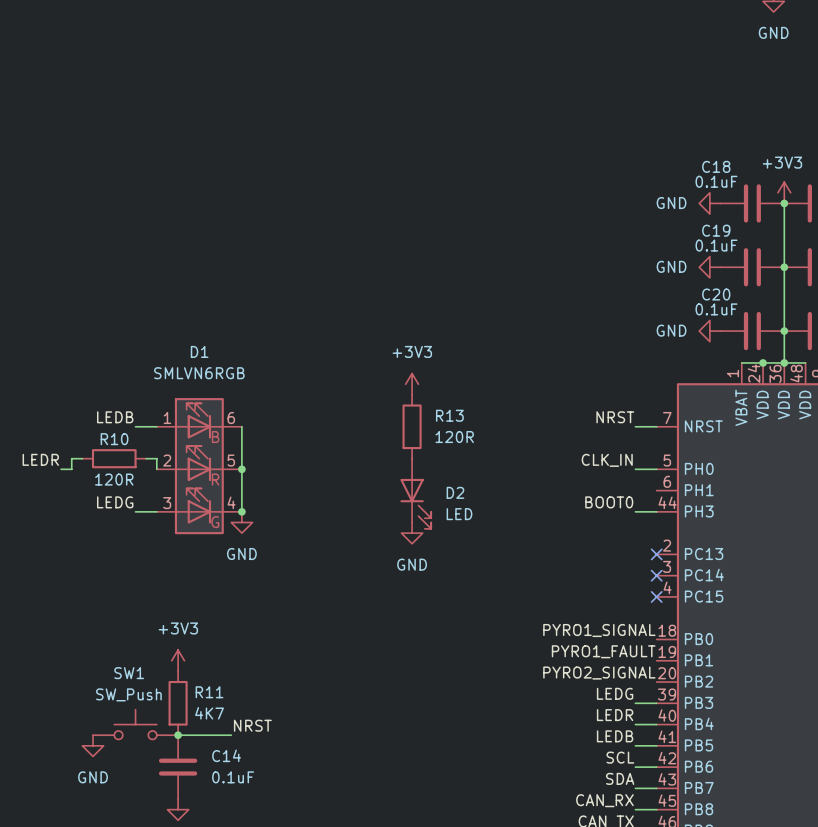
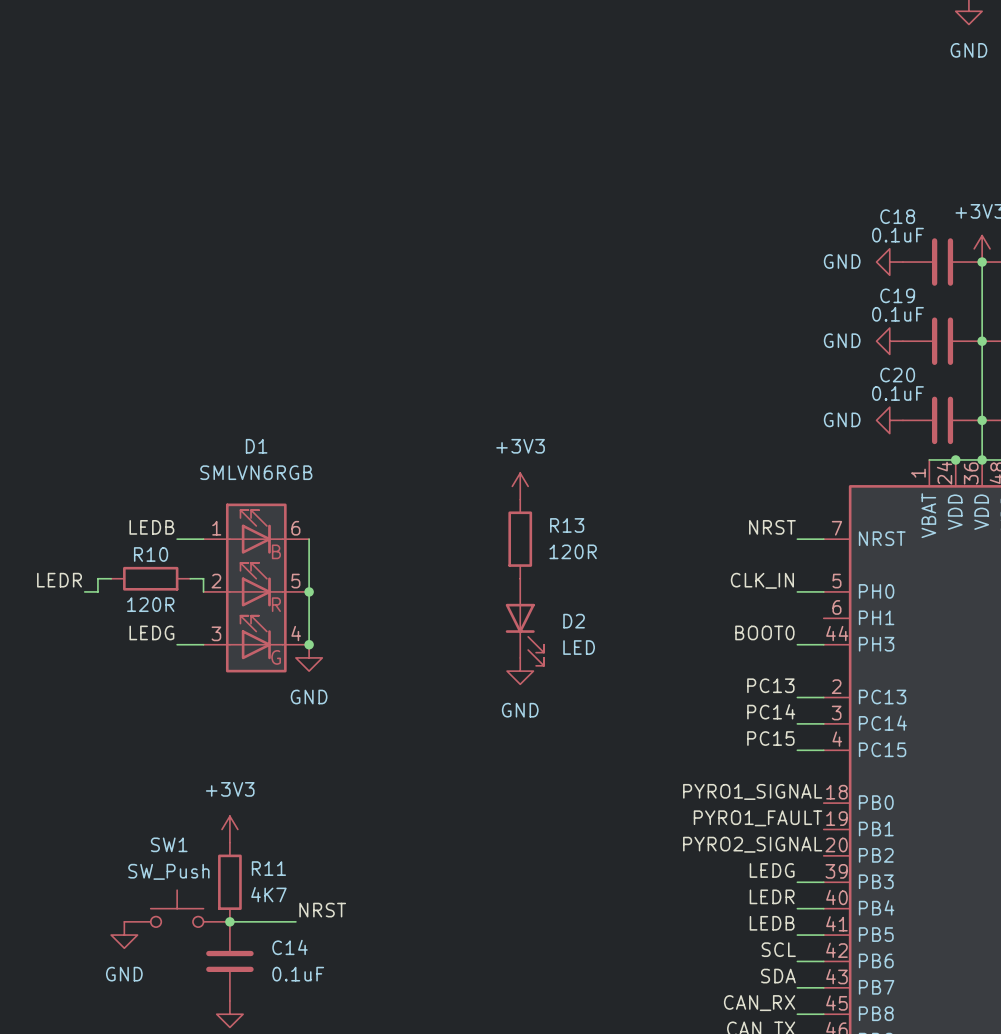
label: none -> PC13 (770, 685)
wire: none -> (797, 697) (823, 697)
no-connect mark: (656, 554) -> none
label: none -> PC14 (771, 711)
wire: none -> (797, 723) (823, 723)
no-connect mark: (656, 575) -> none
label: none -> PC15 (770, 738)
wire: none -> (797, 750) (823, 750)
no-connect mark: (656, 596) -> none

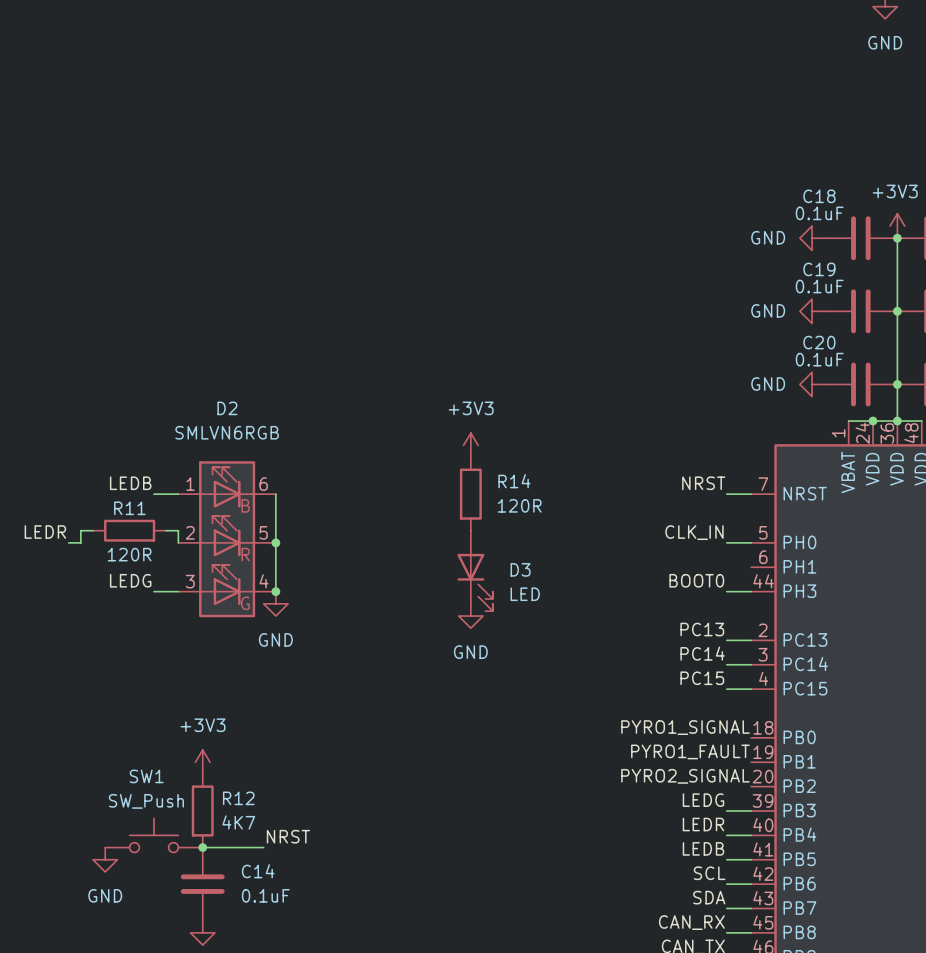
D1 name: D1 (256, 446) -> D2 (227, 408)
R13 name: R13 (567, 525) -> R14 (514, 481)
R10 name: R10 (151, 554) -> R11 (129, 508)
D2 name: D2 (574, 621) -> D3 (520, 569)
R11 name: R11 (268, 868) -> R12 (238, 798)

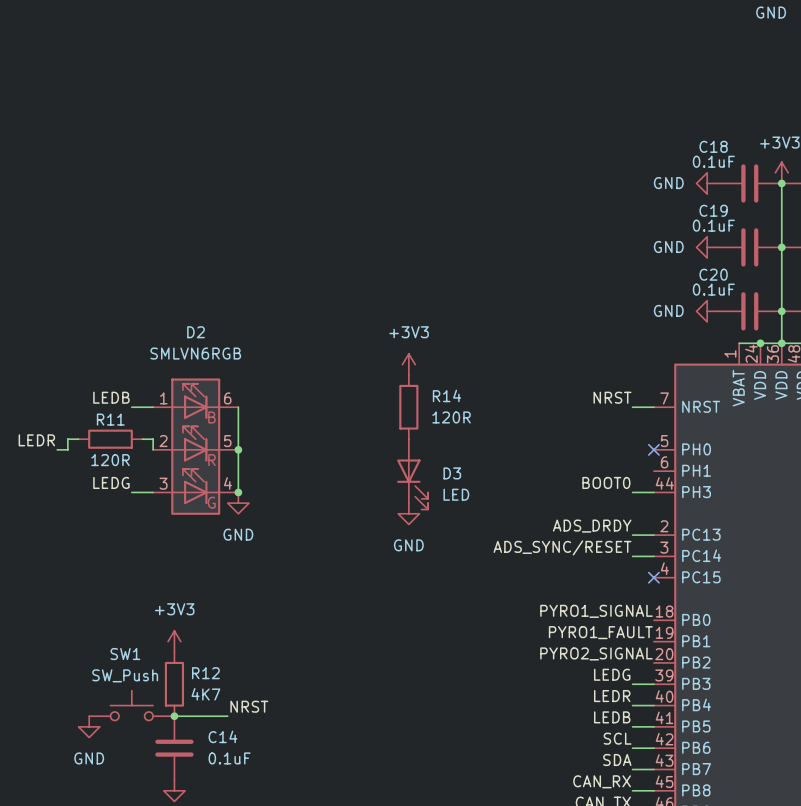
label: CLK_IN (694, 532) -> none
wire: (726, 542) (751, 542) -> none
no-connect mark: none -> (653, 449)
label: PC13 (702, 629) -> ADS_DRDY (592, 526)
label: PC14 (702, 653) -> ADS_SYNC/RESET (562, 547)
label: PC15 (702, 678) -> none
wire: (726, 689) (751, 689) -> none
no-connect mark: none -> (653, 577)

